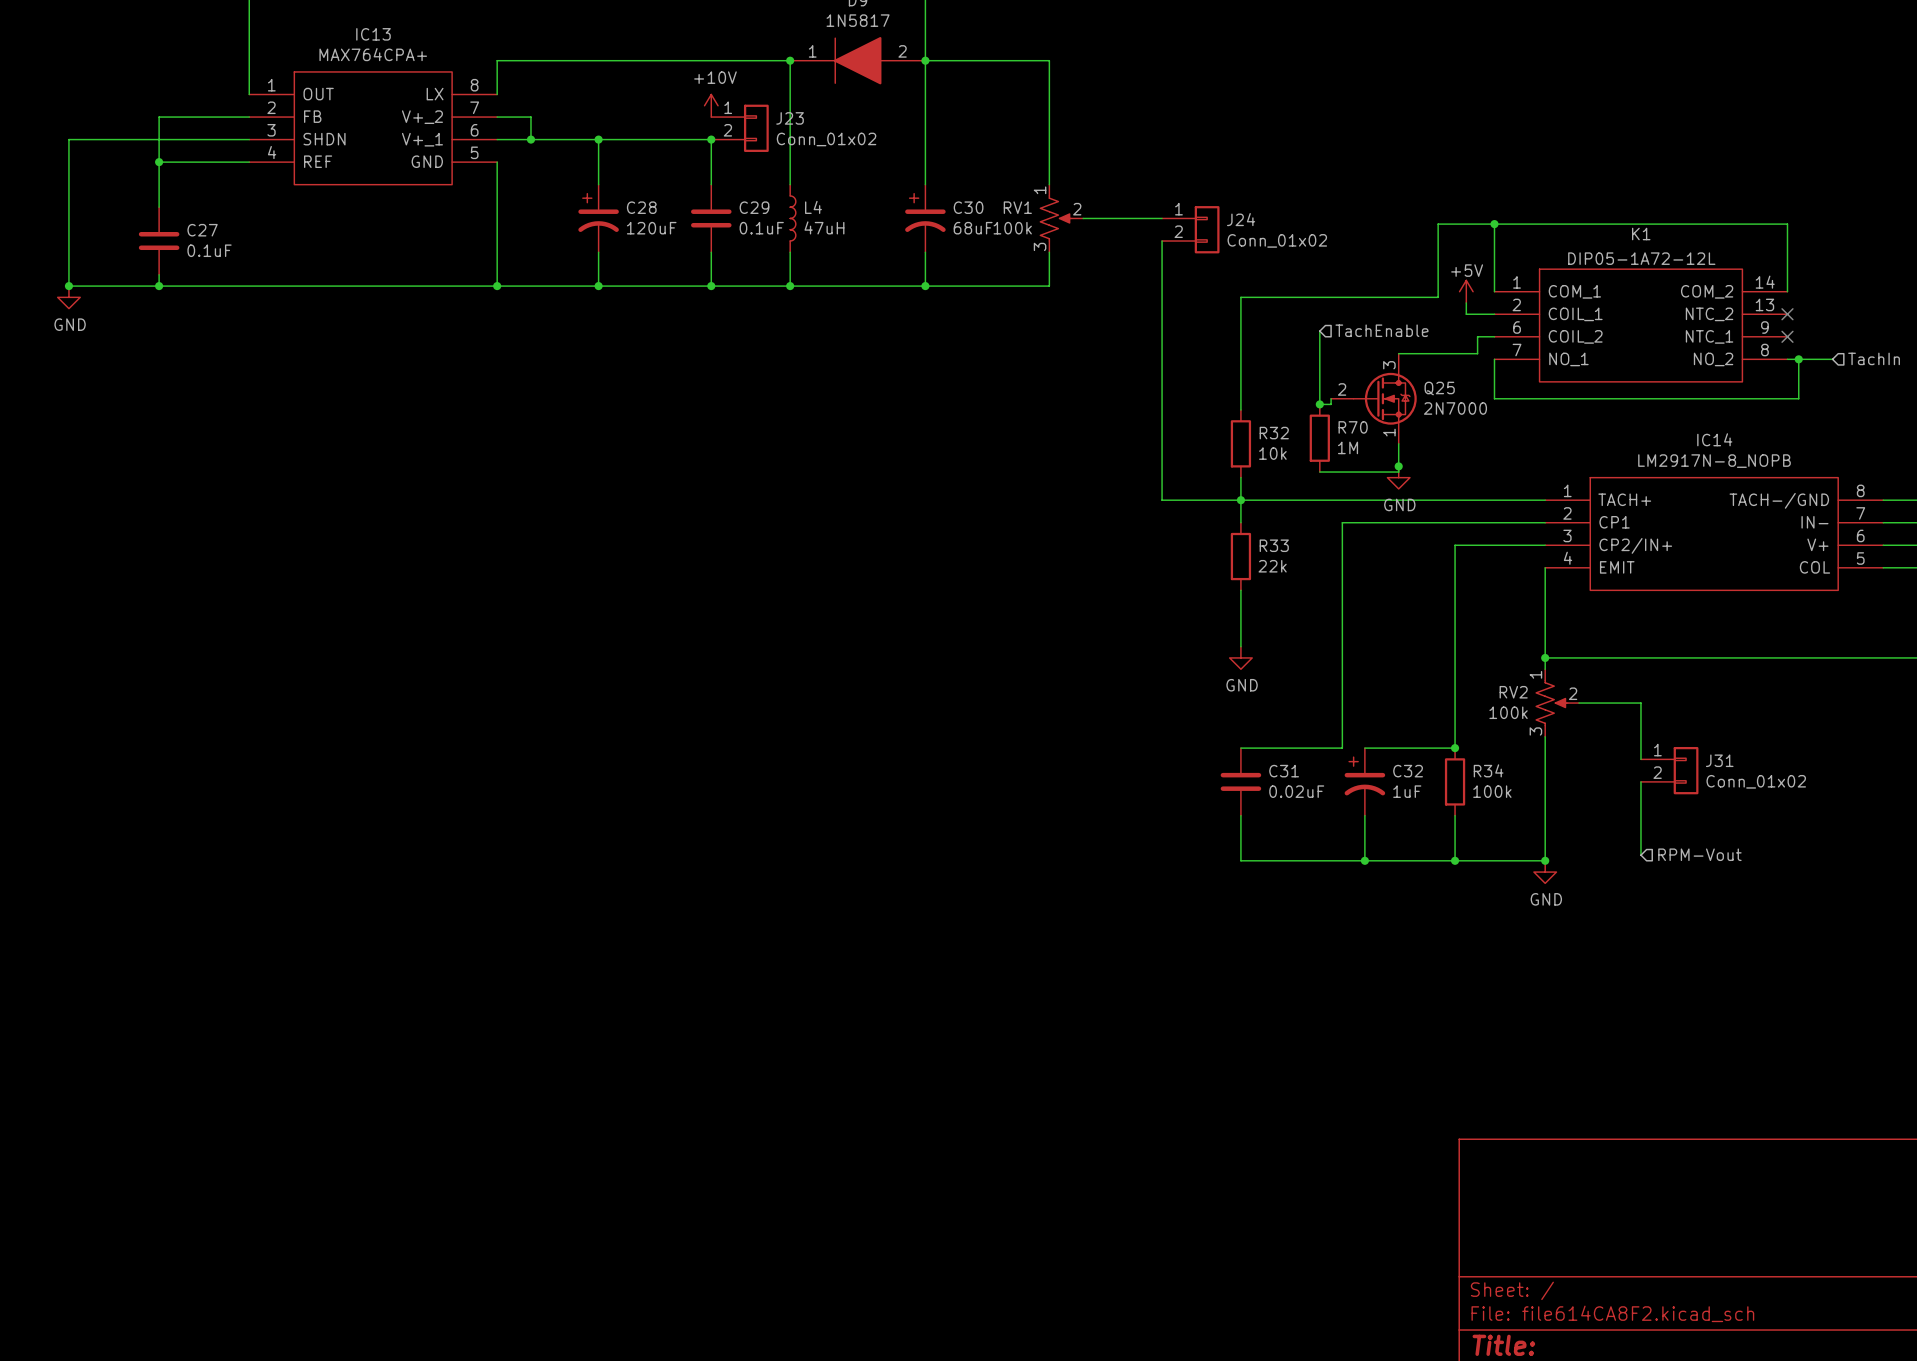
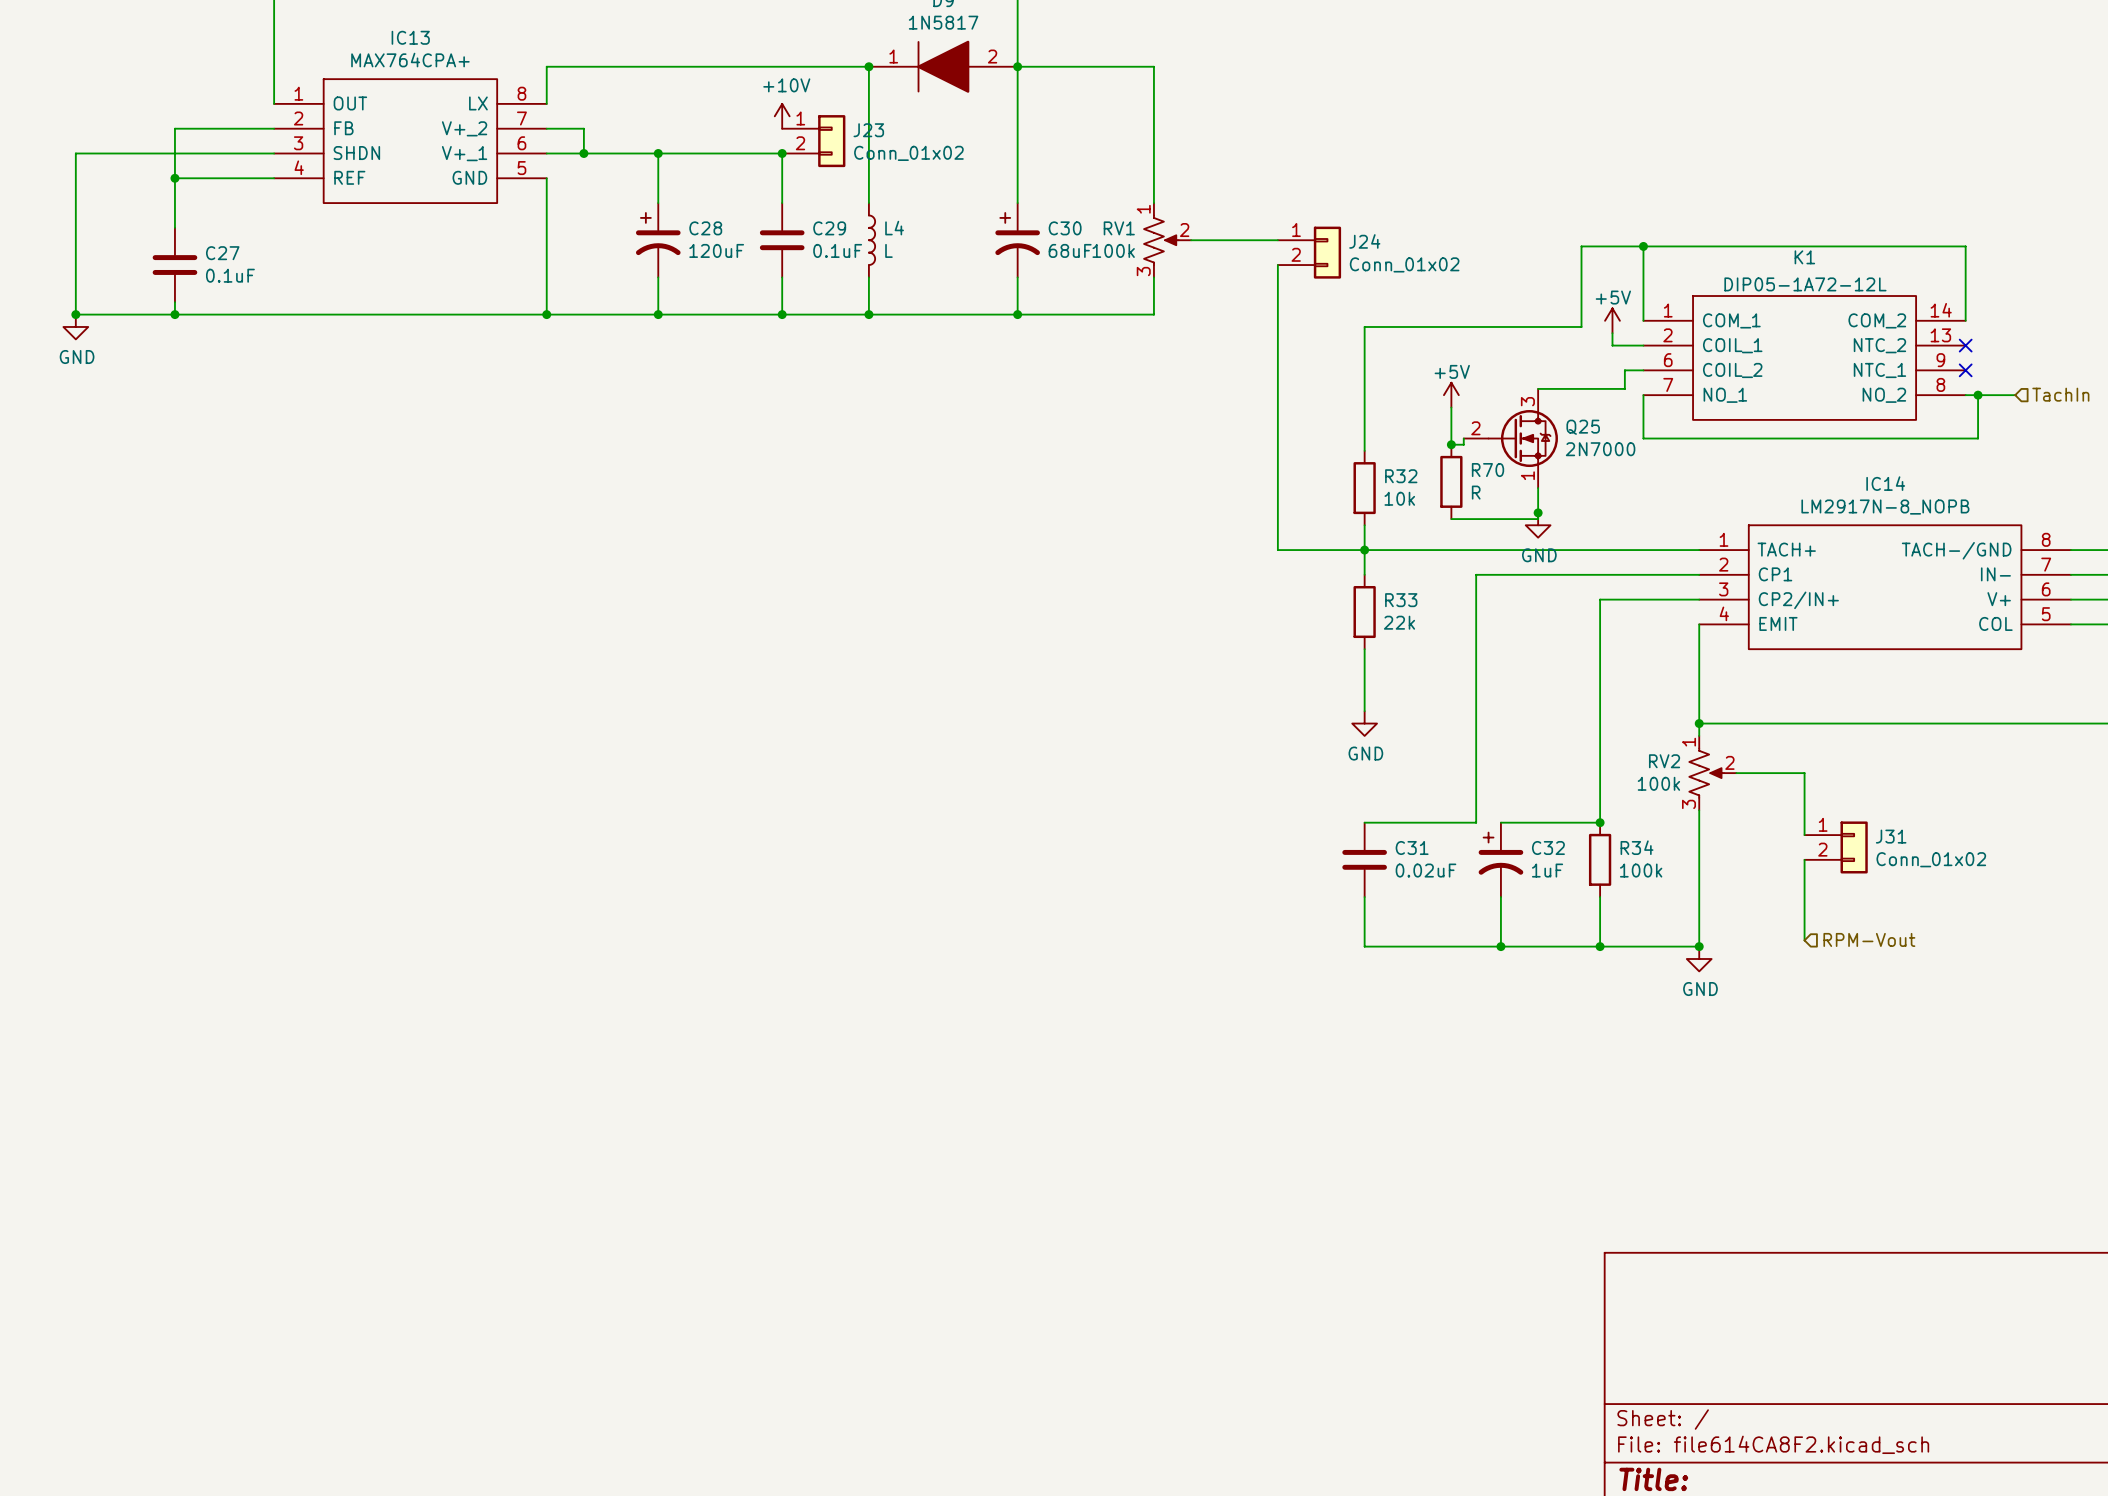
L4 value: 47uH (824, 227) -> L (888, 250)
hierarchical label: TachEnable (1381, 330) -> none
power symbol: none -> +5V (1451, 395)
R70 value: 1M (1348, 447) -> R (1476, 492)

